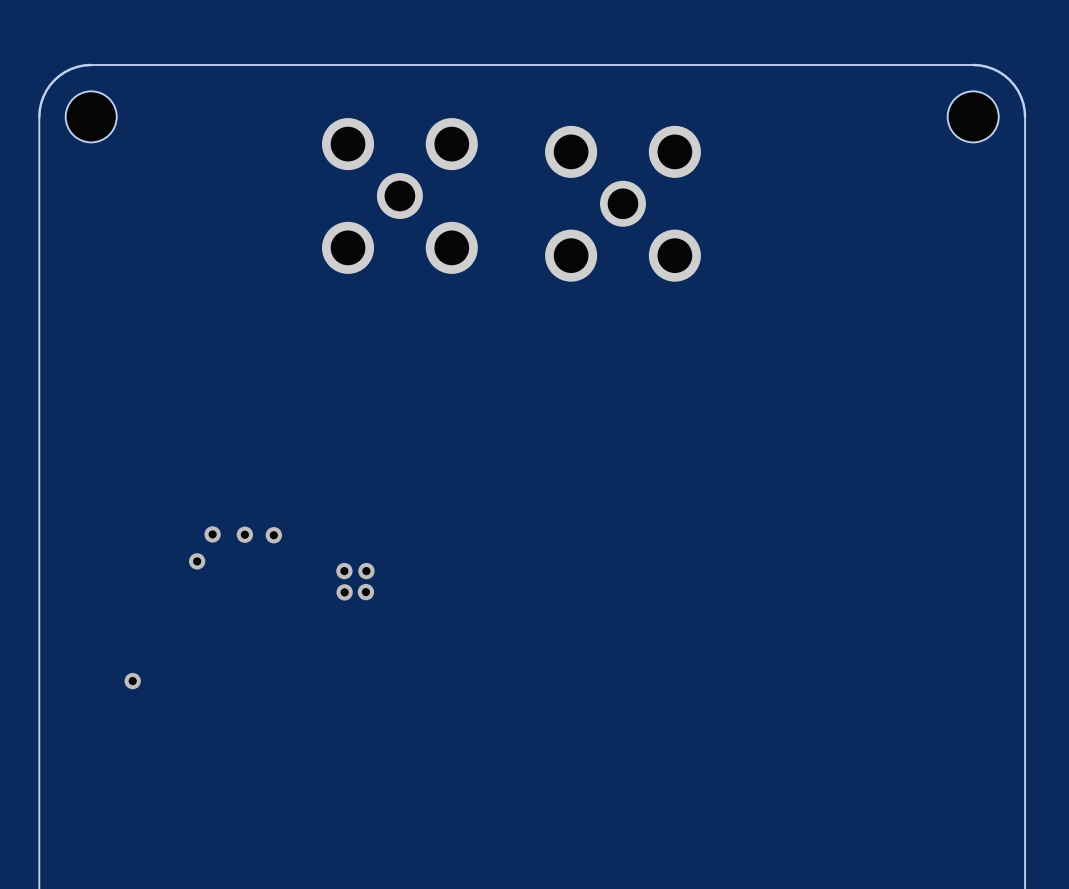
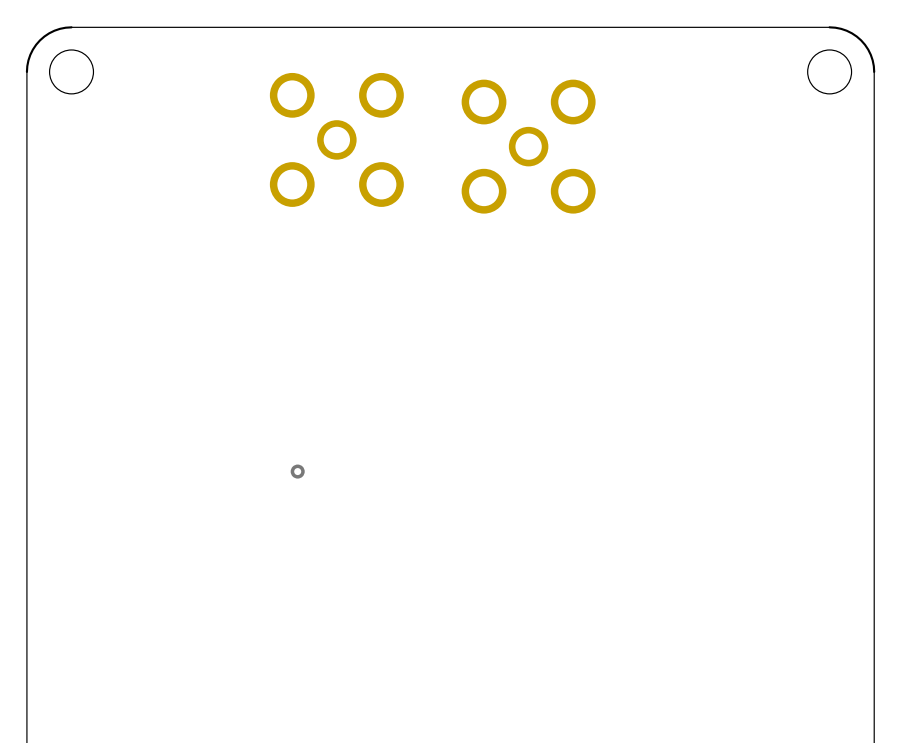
via: (212, 534) -> none
via: (244, 534) -> none
via: (273, 535) -> none
via: (197, 561) -> none
via: (344, 571) -> none
via: (366, 571) -> none
via: none -> (297, 471)
via: (344, 592) -> none
via: (365, 592) -> none
via: (132, 681) -> none

